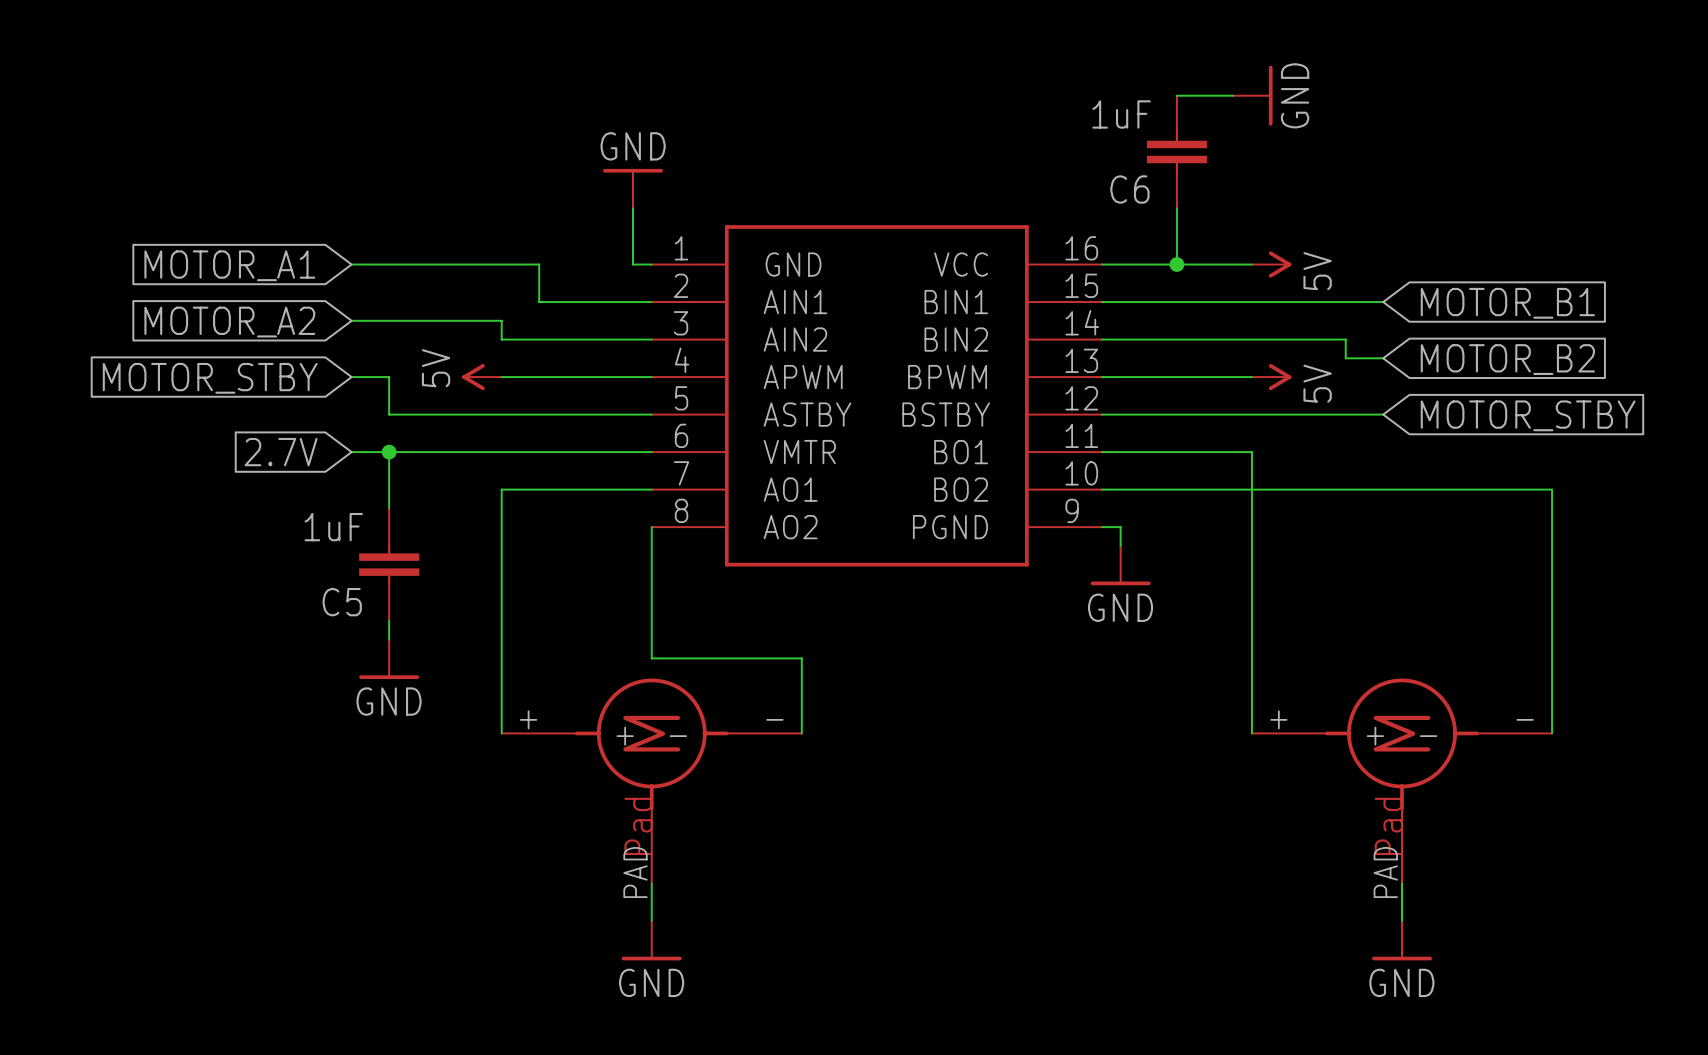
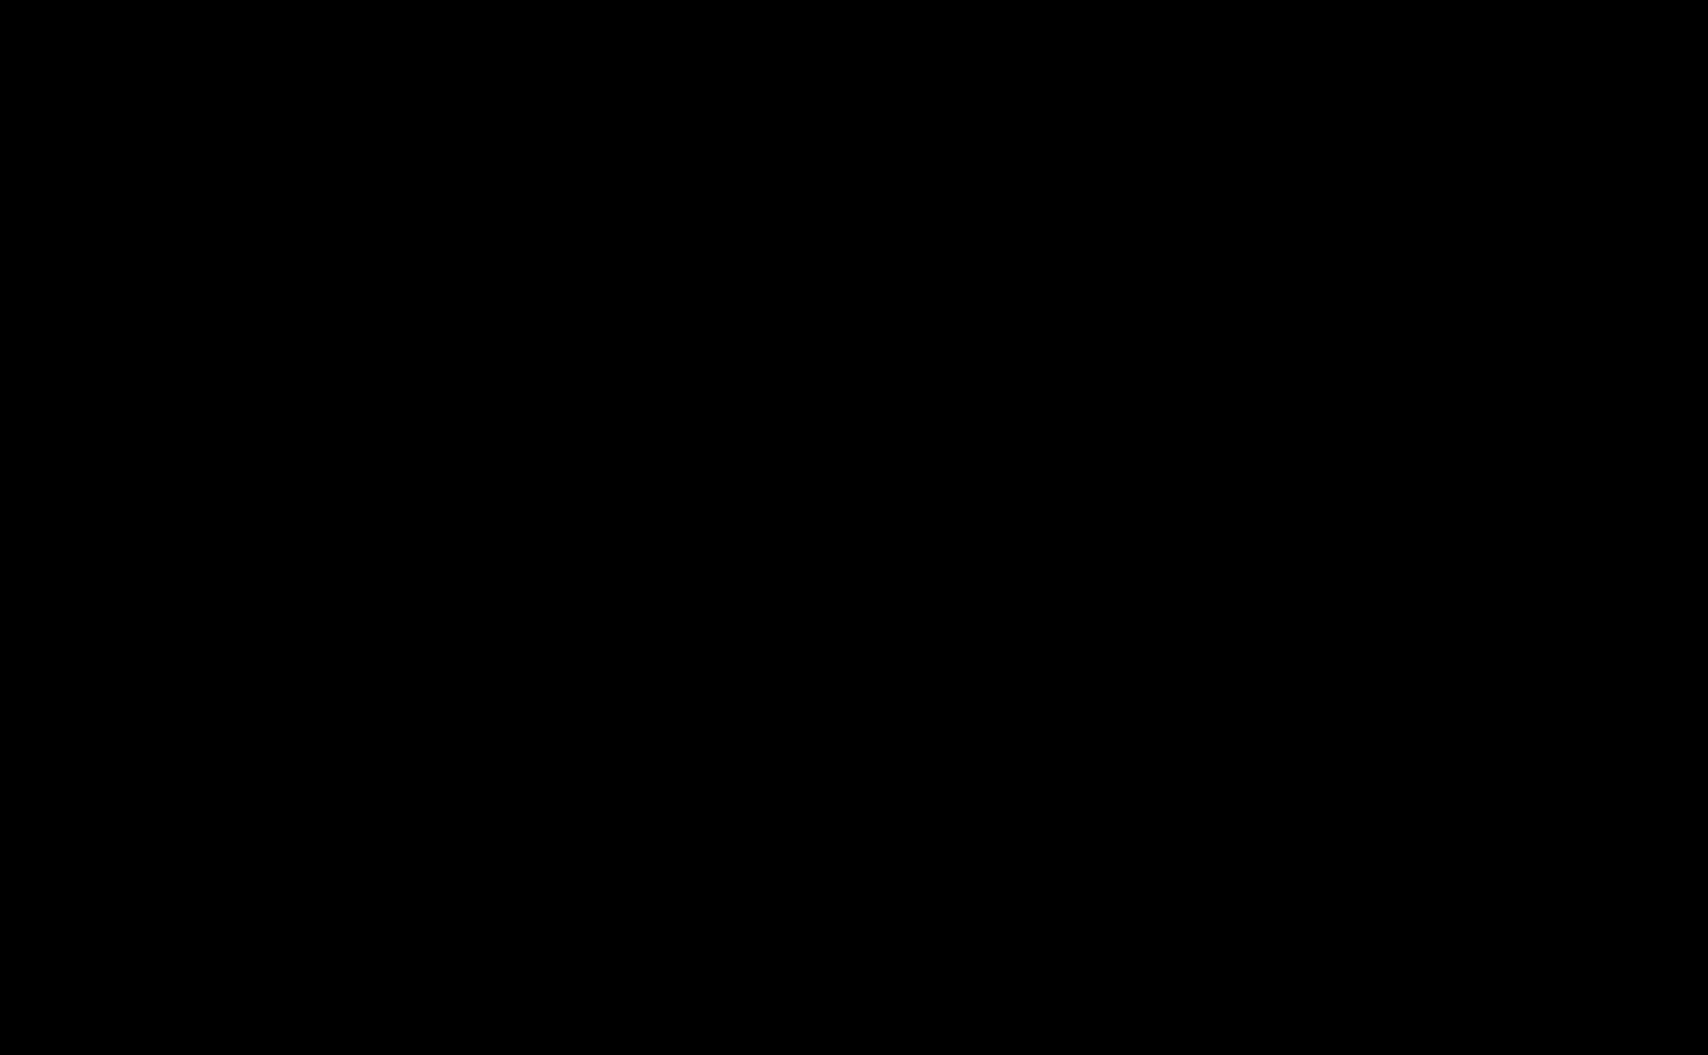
wire: (1176, 95) (1233, 95) -> none
power symbol: GND (1252, 95) -> none
C6: 1uF (1176, 151) -> none
power symbol: GND (632, 188) -> none
wire: (632, 208) (632, 264) (651, 264) -> none
wire: (1176, 208) (1176, 264) -> none
wire: (351, 264) (539, 264) (539, 302) (651, 302) -> none
wire: (1101, 264) (1251, 264) -> none
junction: (1176, 264) -> none
power symbol: 5V (1271, 264) -> none
global label: MOTOR_A1 (229, 265) -> none
wire: (1101, 302) (1383, 302) -> none
global label: MOTOR_B1 (1507, 303) -> none
wire: (351, 320) (501, 320) (501, 339) (651, 339) -> none
global label: MOTOR_A2 (229, 322) -> none
wire: (1101, 339) (1345, 339) (1345, 358) (1383, 358) -> none
global label: MOTOR_B2 (1507, 359) -> none
wire: (351, 377) (389, 377) (389, 414) (651, 414) -> none
power symbol: 5V (482, 377) -> none
wire: (501, 377) (651, 377) -> none
wire: (1101, 377) (1251, 377) -> none
power symbol: 5V (1271, 377) -> none
global label: MOTOR_STBY (210, 378) -> none
part: (876, 395) -> none
wire: (1101, 414) (1383, 414) -> none
global label: MOTOR_STBY (1528, 415) -> none
global label: 2.7V (281, 452) -> none
wire: (351, 452) (651, 452) -> none
wire: (389, 452) (389, 508) -> none
junction: (389, 452) -> none
wire: (1101, 452) (1251, 452) (1251, 733) -> none
wire: (651, 489) (501, 489) (501, 733) -> none
wire: (1101, 489) (1552, 489) (1552, 733) -> none
wire: (651, 527) (651, 658) (801, 658) (801, 733) -> none
wire: (1101, 527) (1120, 527) (1120, 545) -> none
C5: 1uF (389, 564) -> none
power symbol: GND (1120, 565) -> none
wire: (389, 620) (389, 639) -> none
power symbol: GND (389, 659) -> none
part: (651, 781) -> none
part: (1402, 781) -> none
wire: (651, 883) (651, 921) -> none
wire: (1402, 883) (1402, 921) -> none
power symbol: GND (651, 940) -> none
power symbol: GND (1402, 940) -> none

